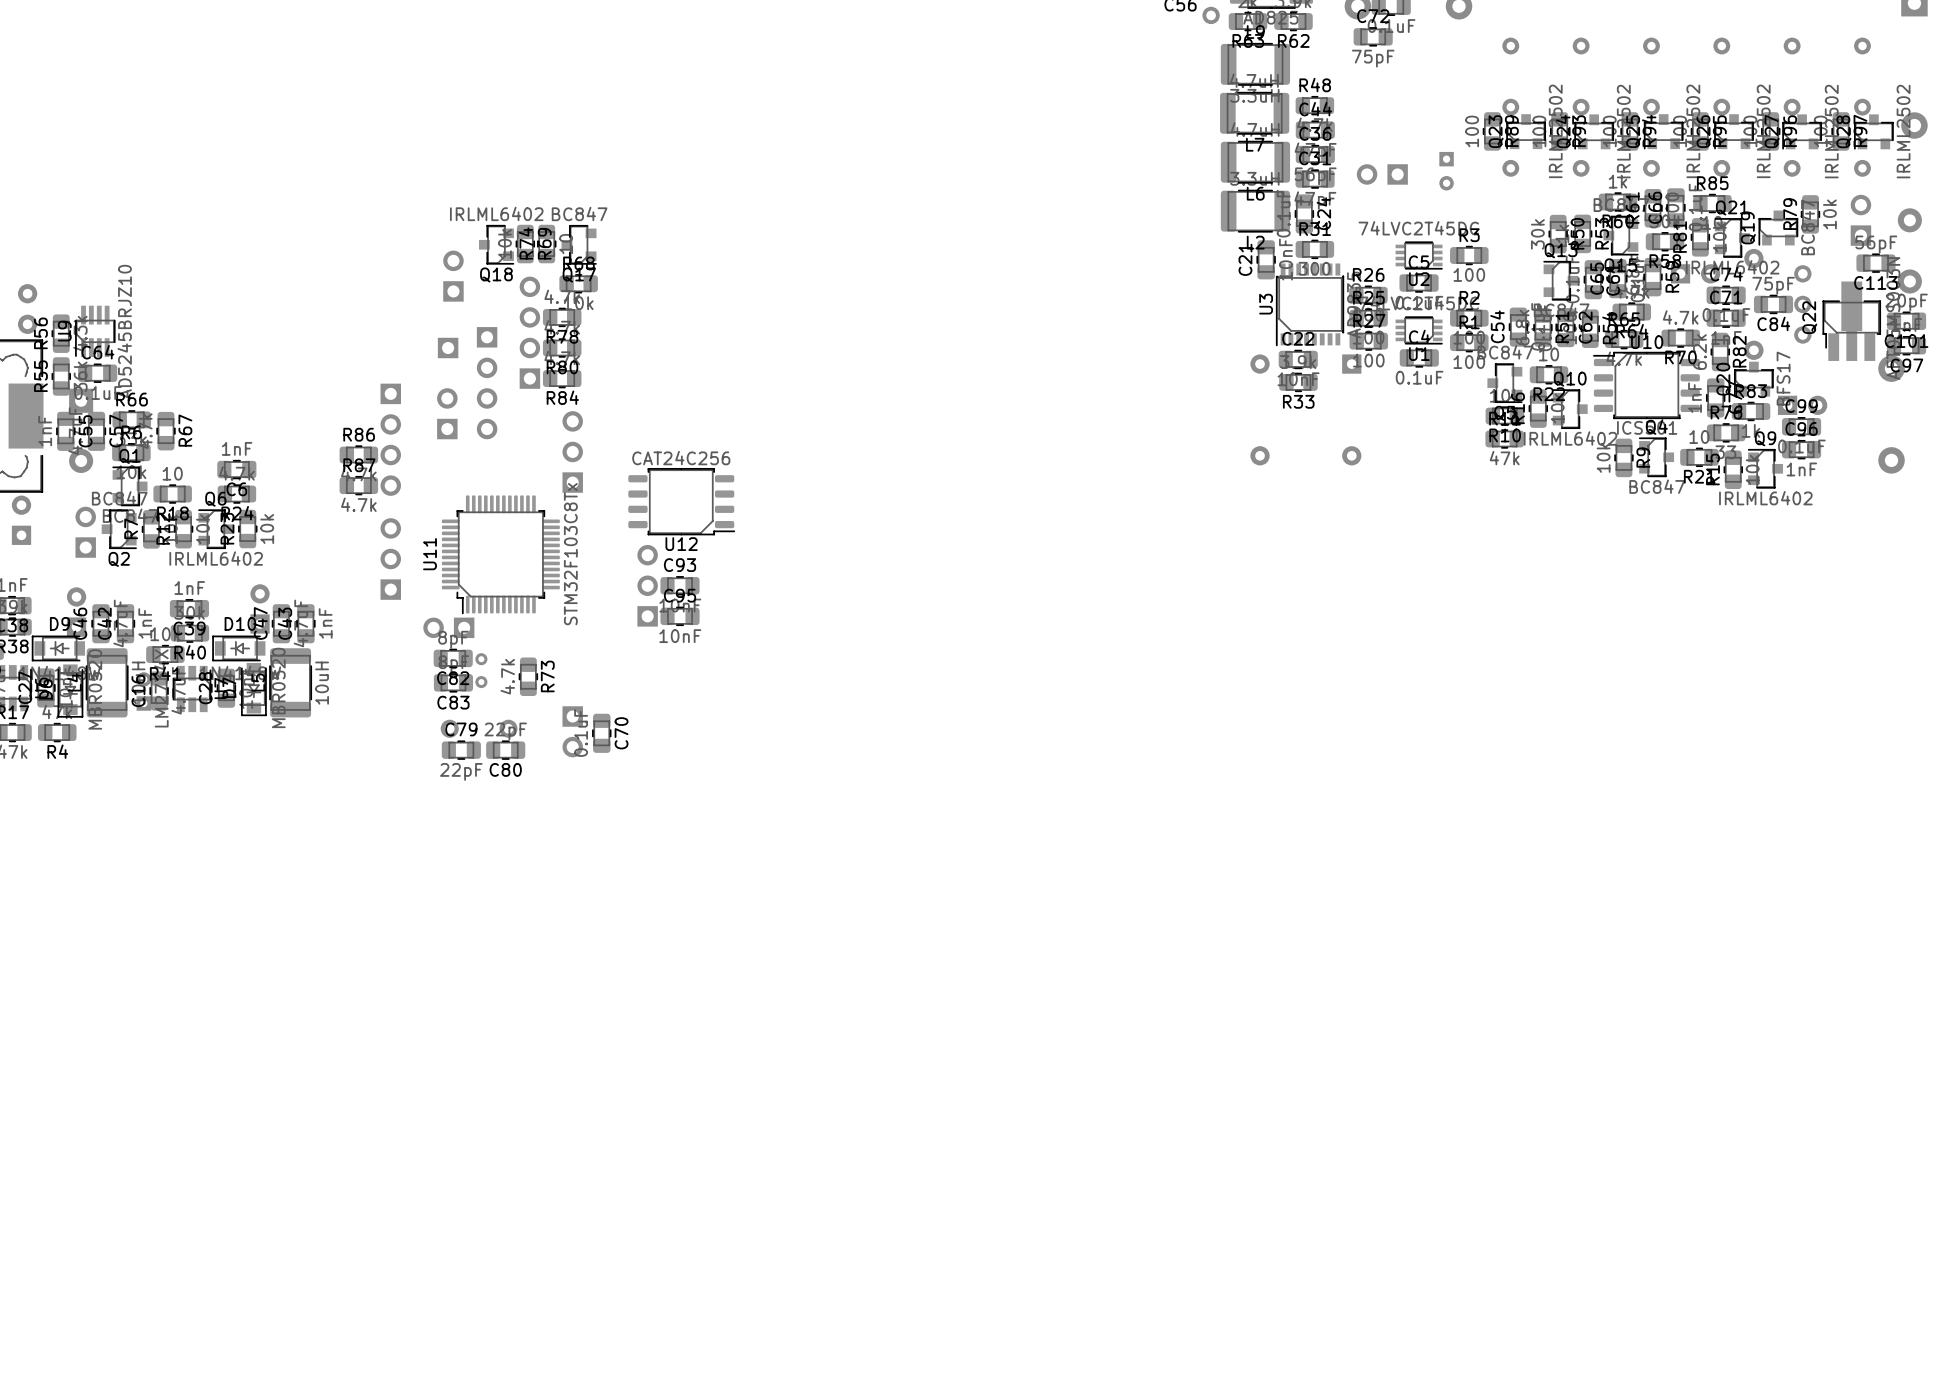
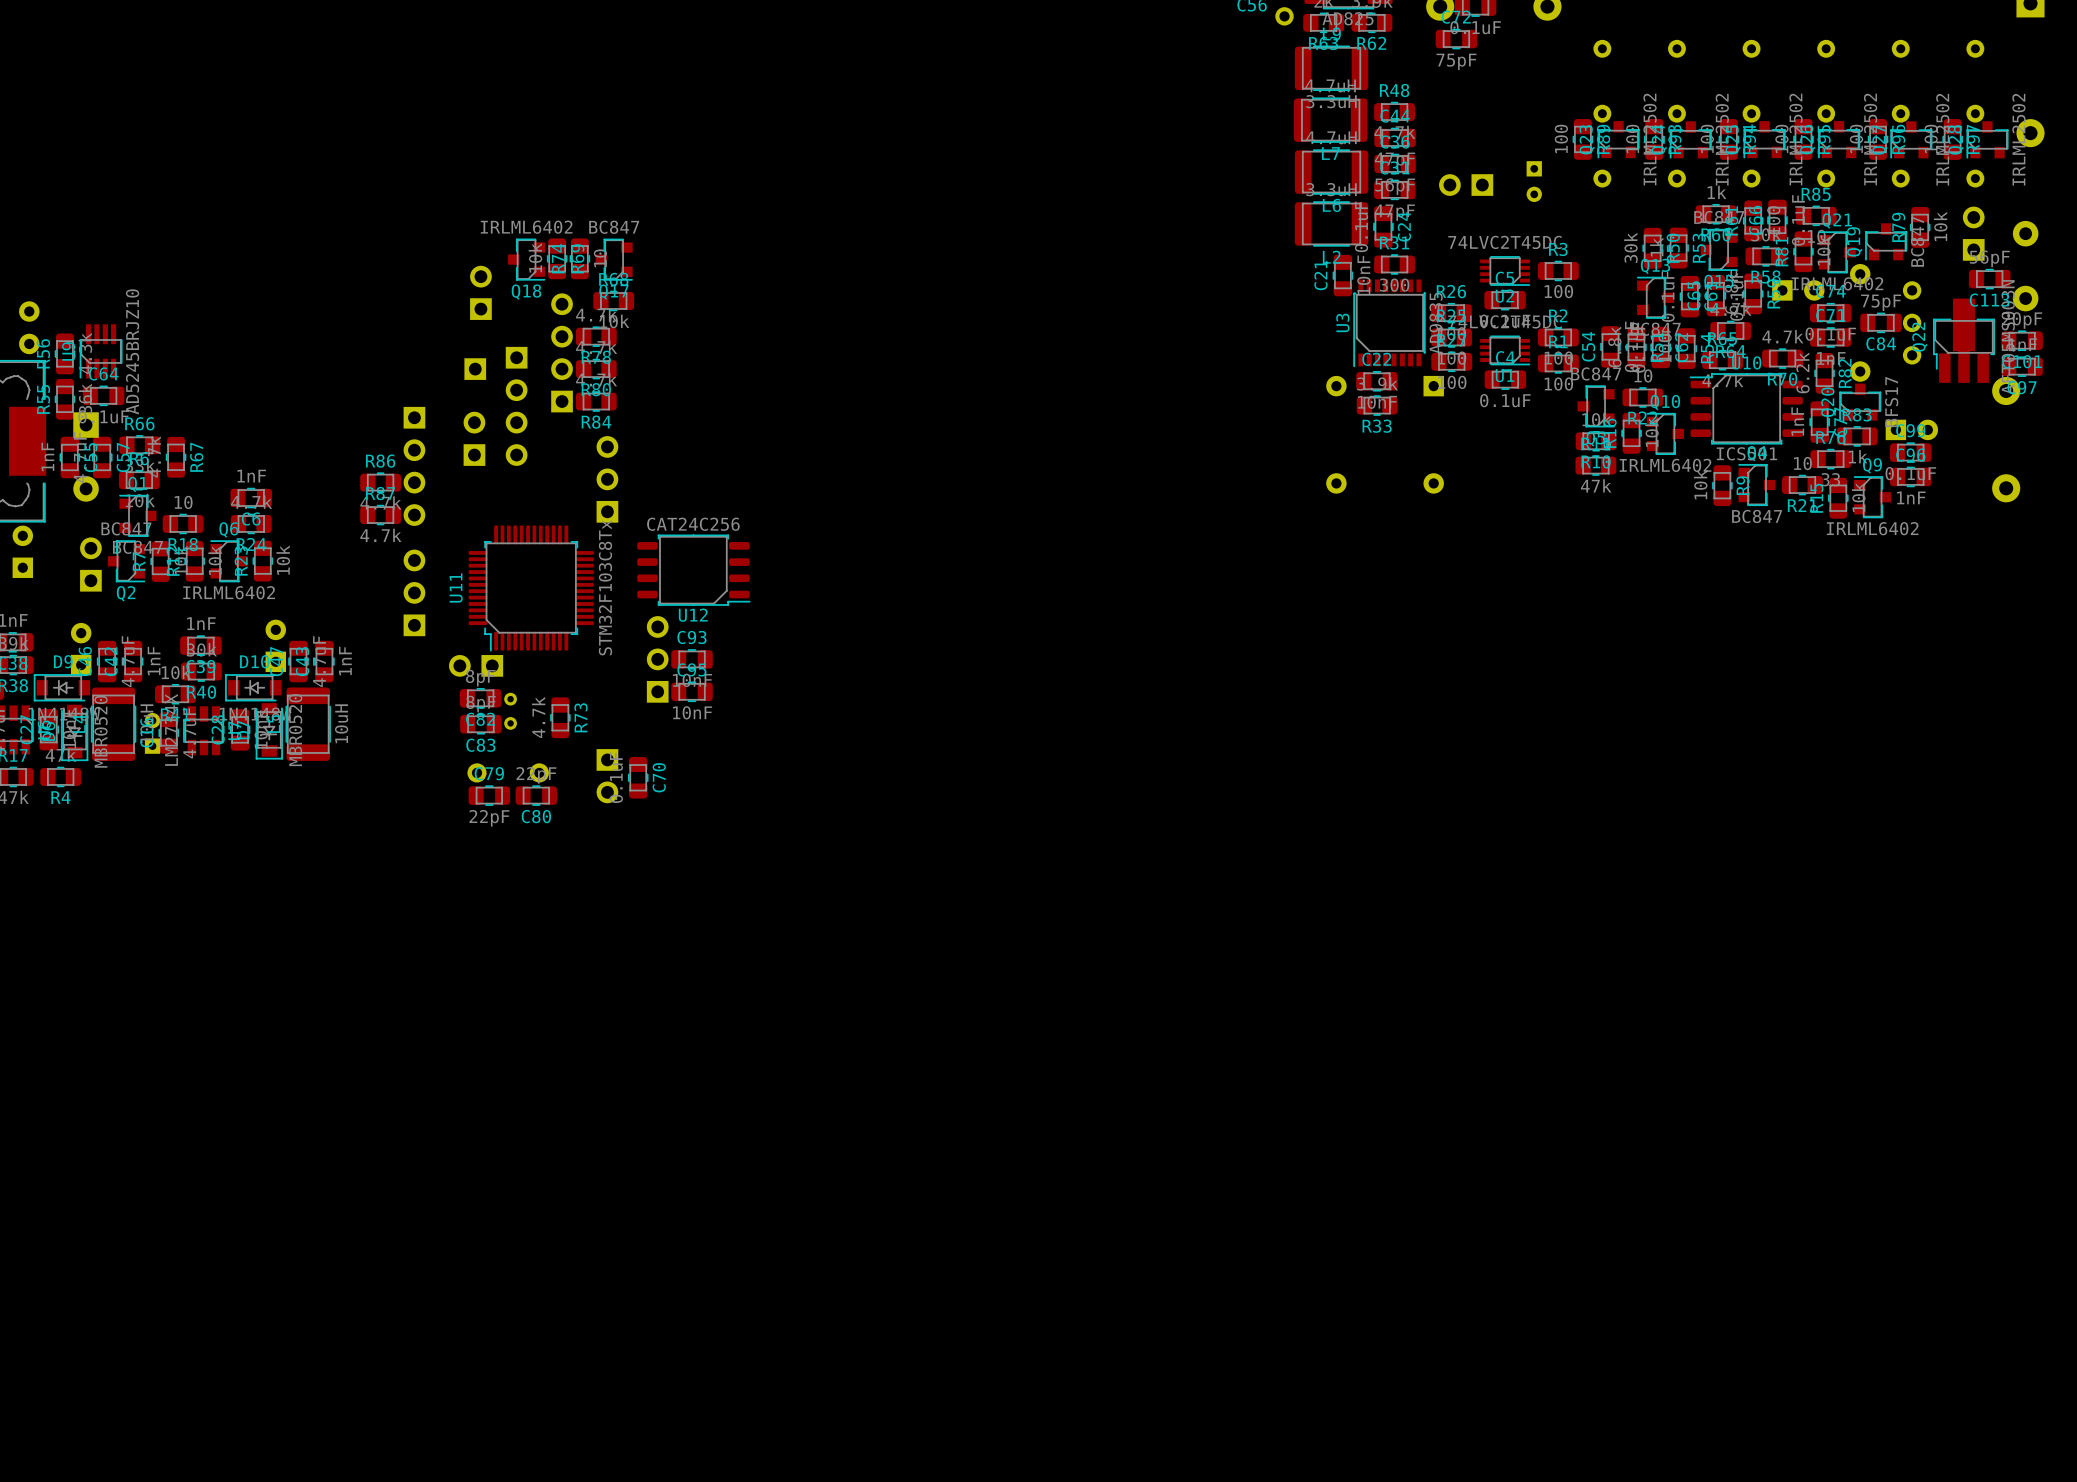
U12 position: (681, 501) -> (693, 570)
part position: (647, 585) -> (657, 659)
C93 position: (680, 585) -> (692, 659)
C95 position: (680, 616) -> (692, 691)

